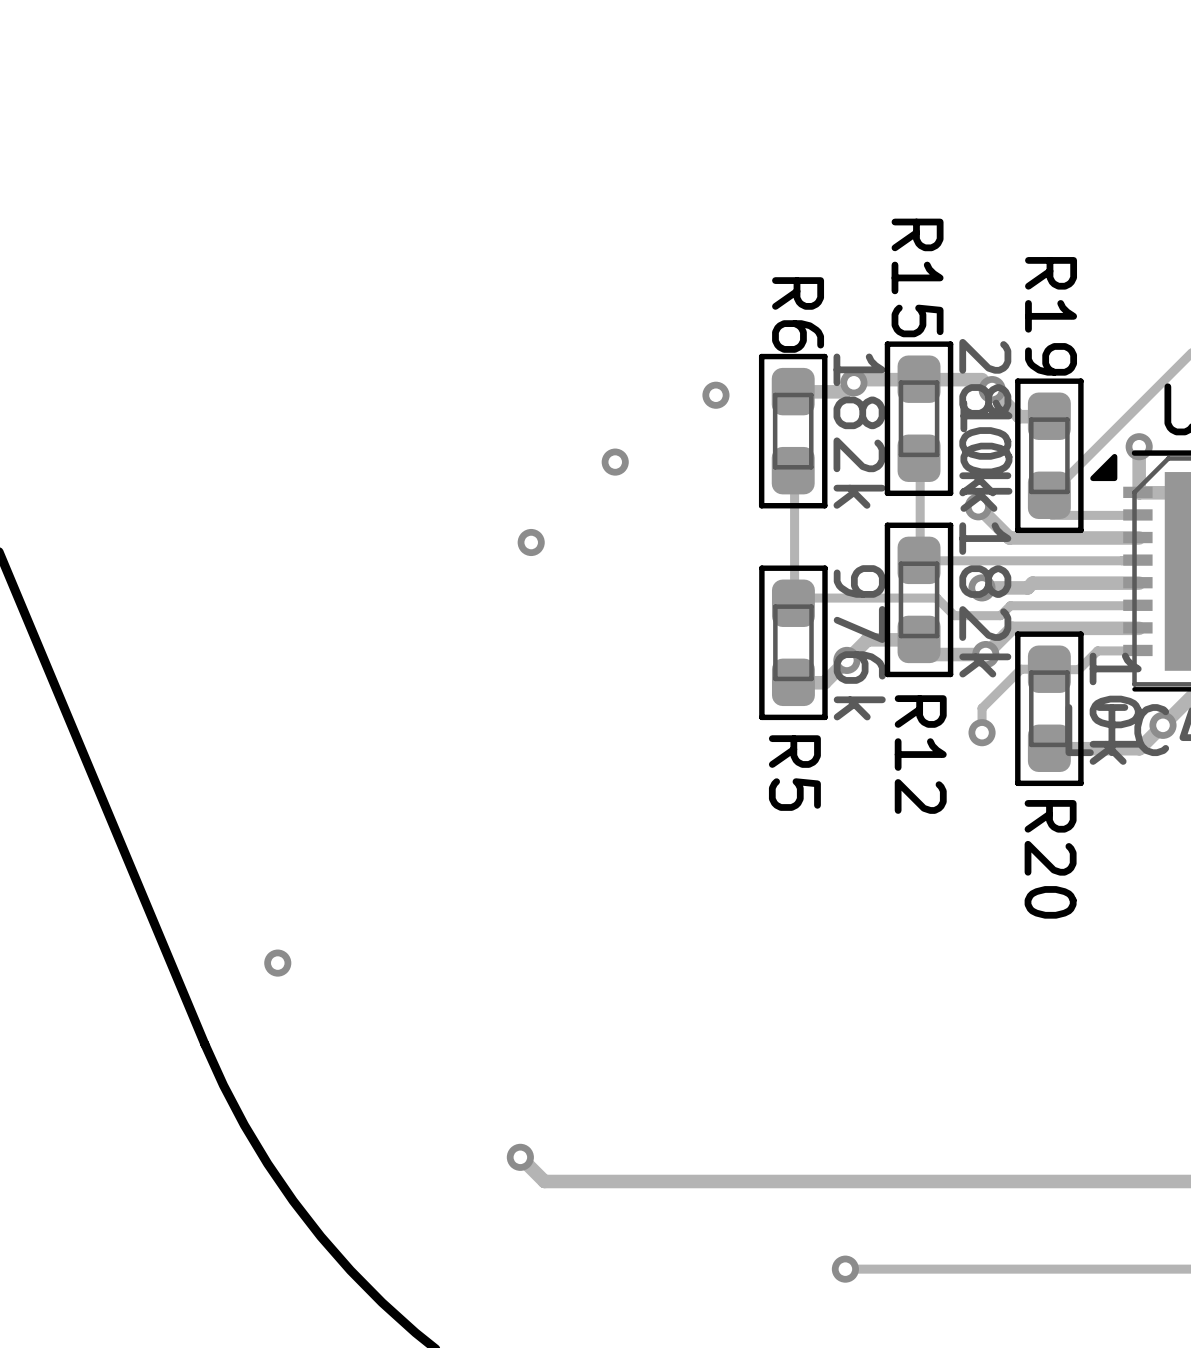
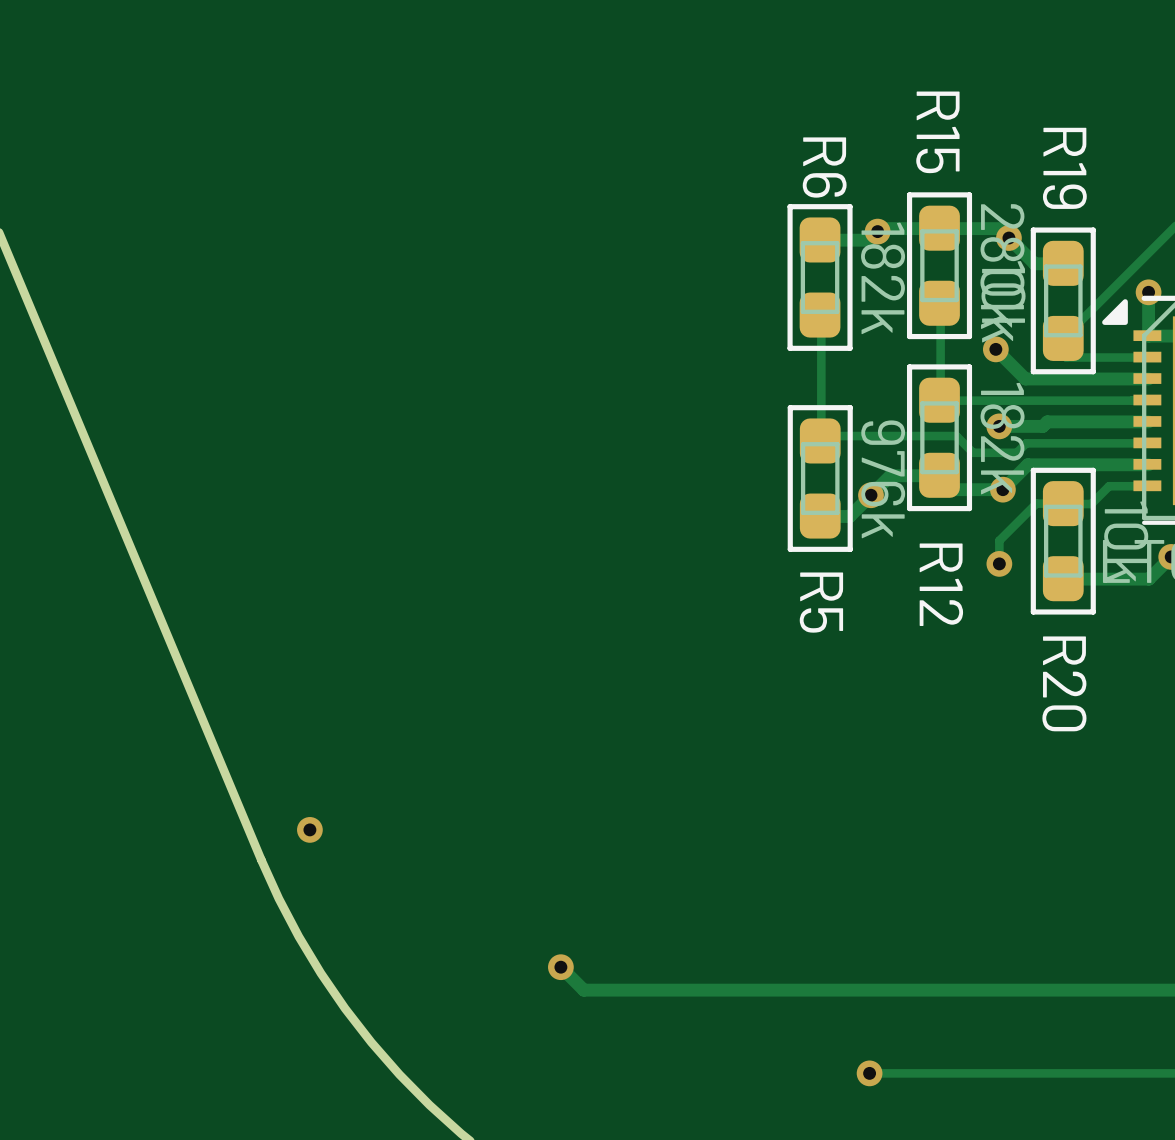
via: (715, 395) -> none
via: (615, 462) -> none
via: (531, 542) -> none
via position: (277, 963) -> (309, 829)

